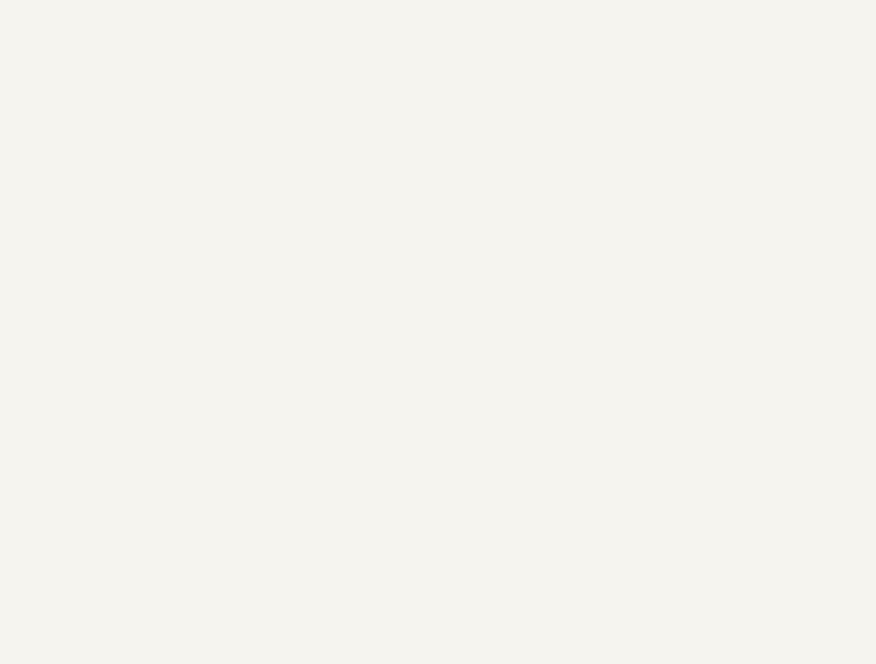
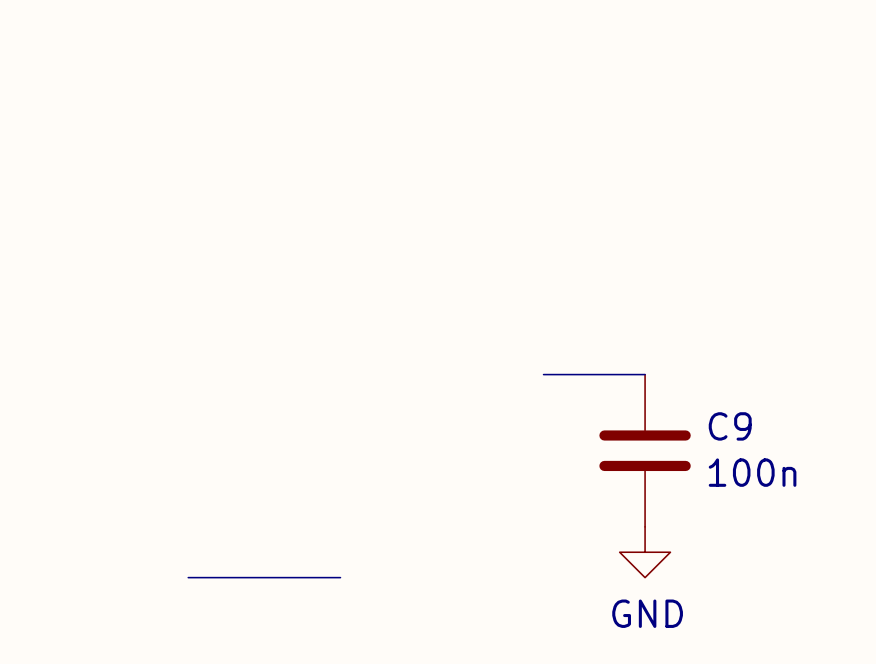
wire: none -> (543, 374) (645, 374)
C9: none -> 100n (645, 450)
power symbol: none -> GND (645, 552)
wire: none -> (188, 577) (340, 577)

